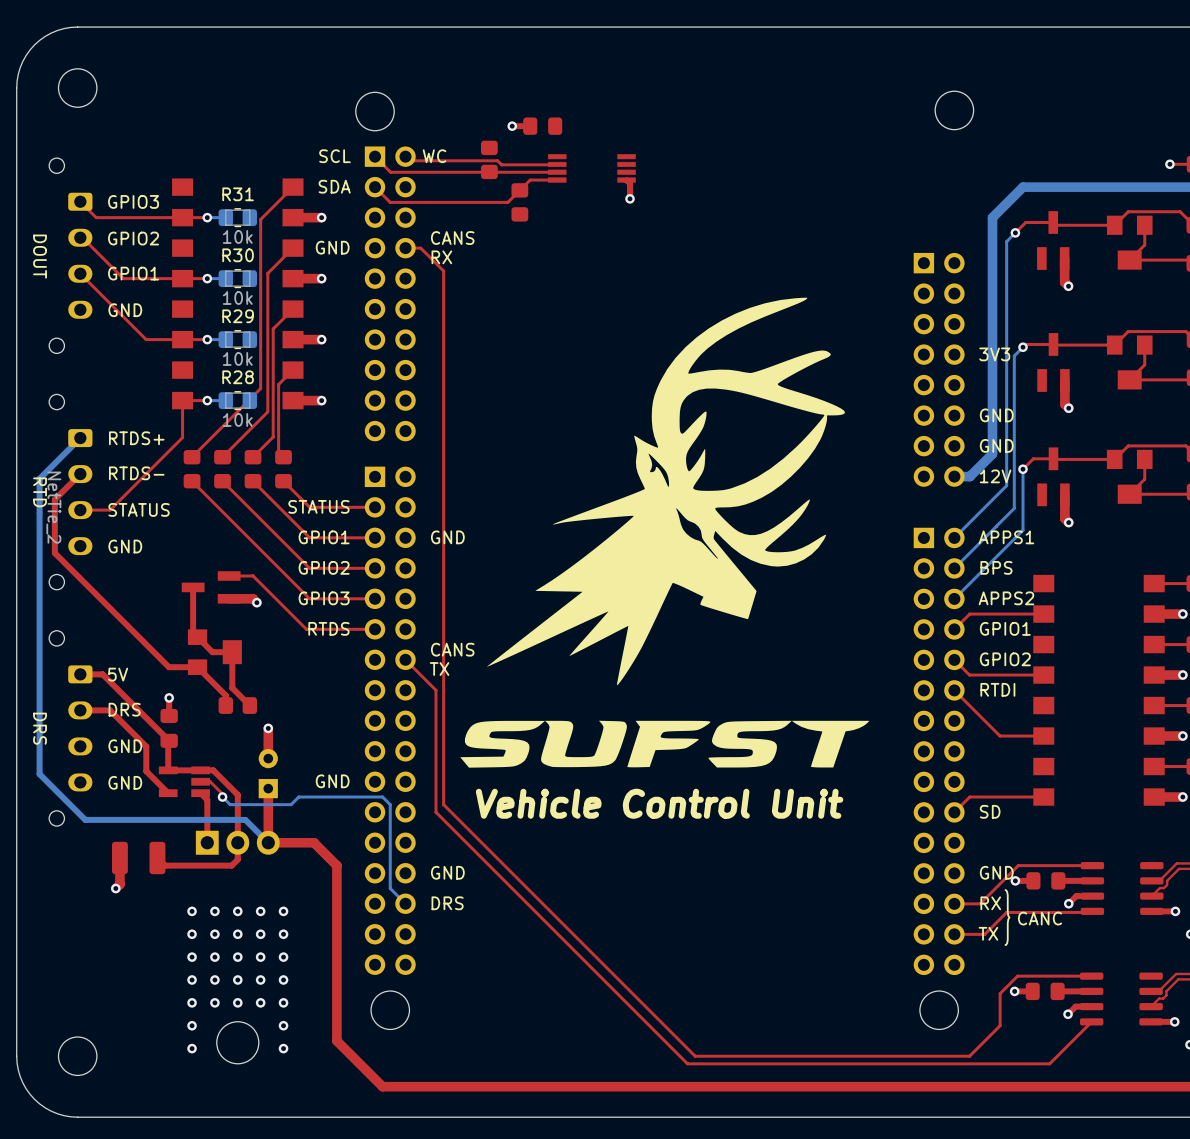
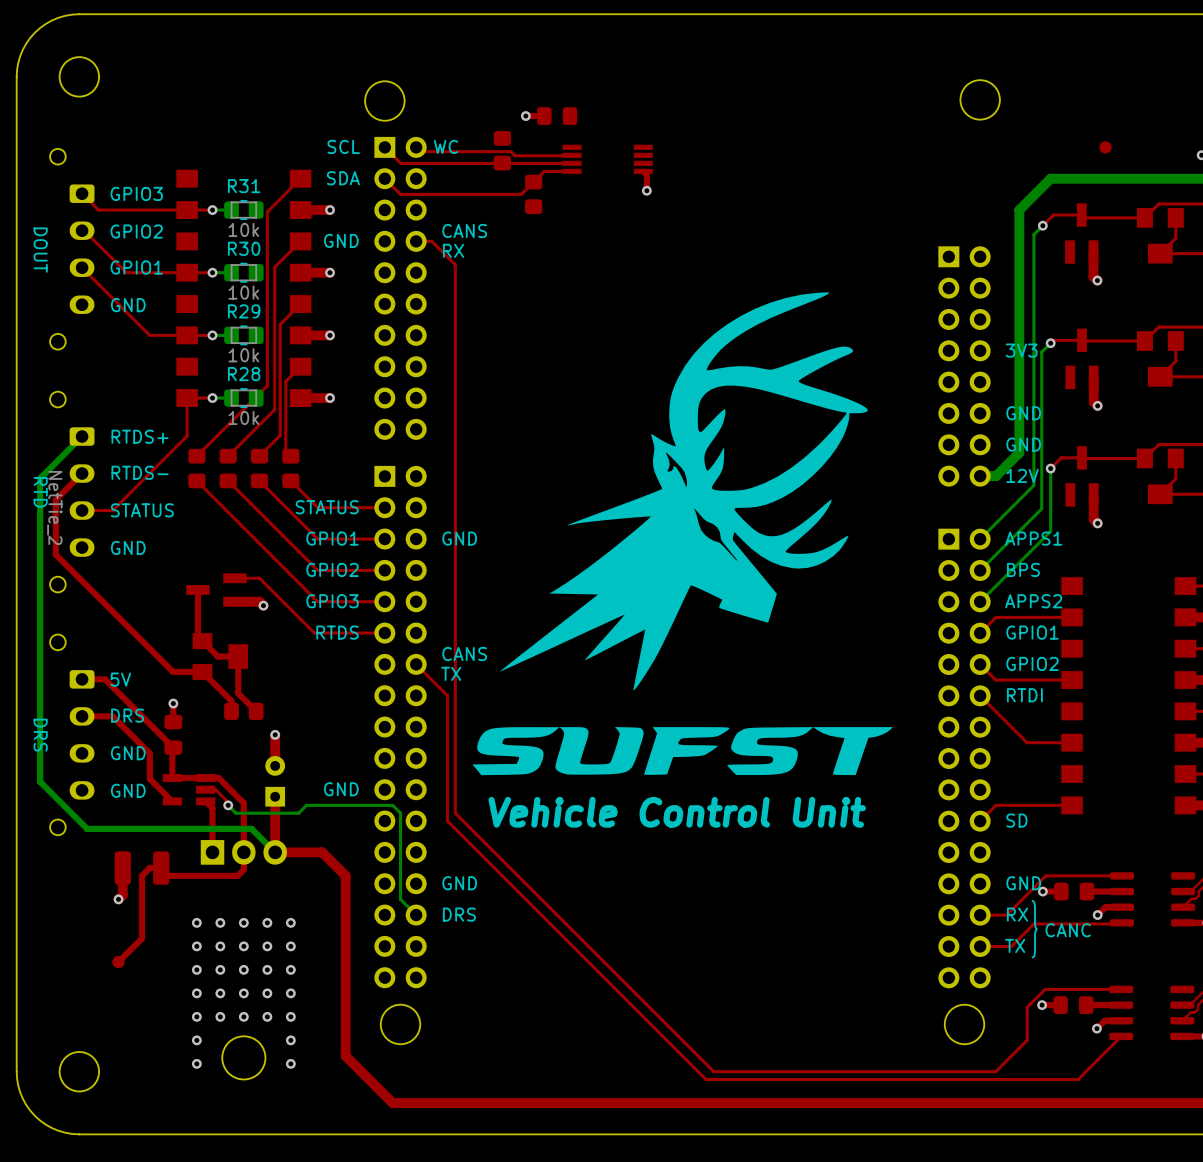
part: none -> (1105, 147)
top track: none -> (161, 868) (149, 868) (142, 875) (142, 938) (118, 962)
part: none -> (118, 962)

